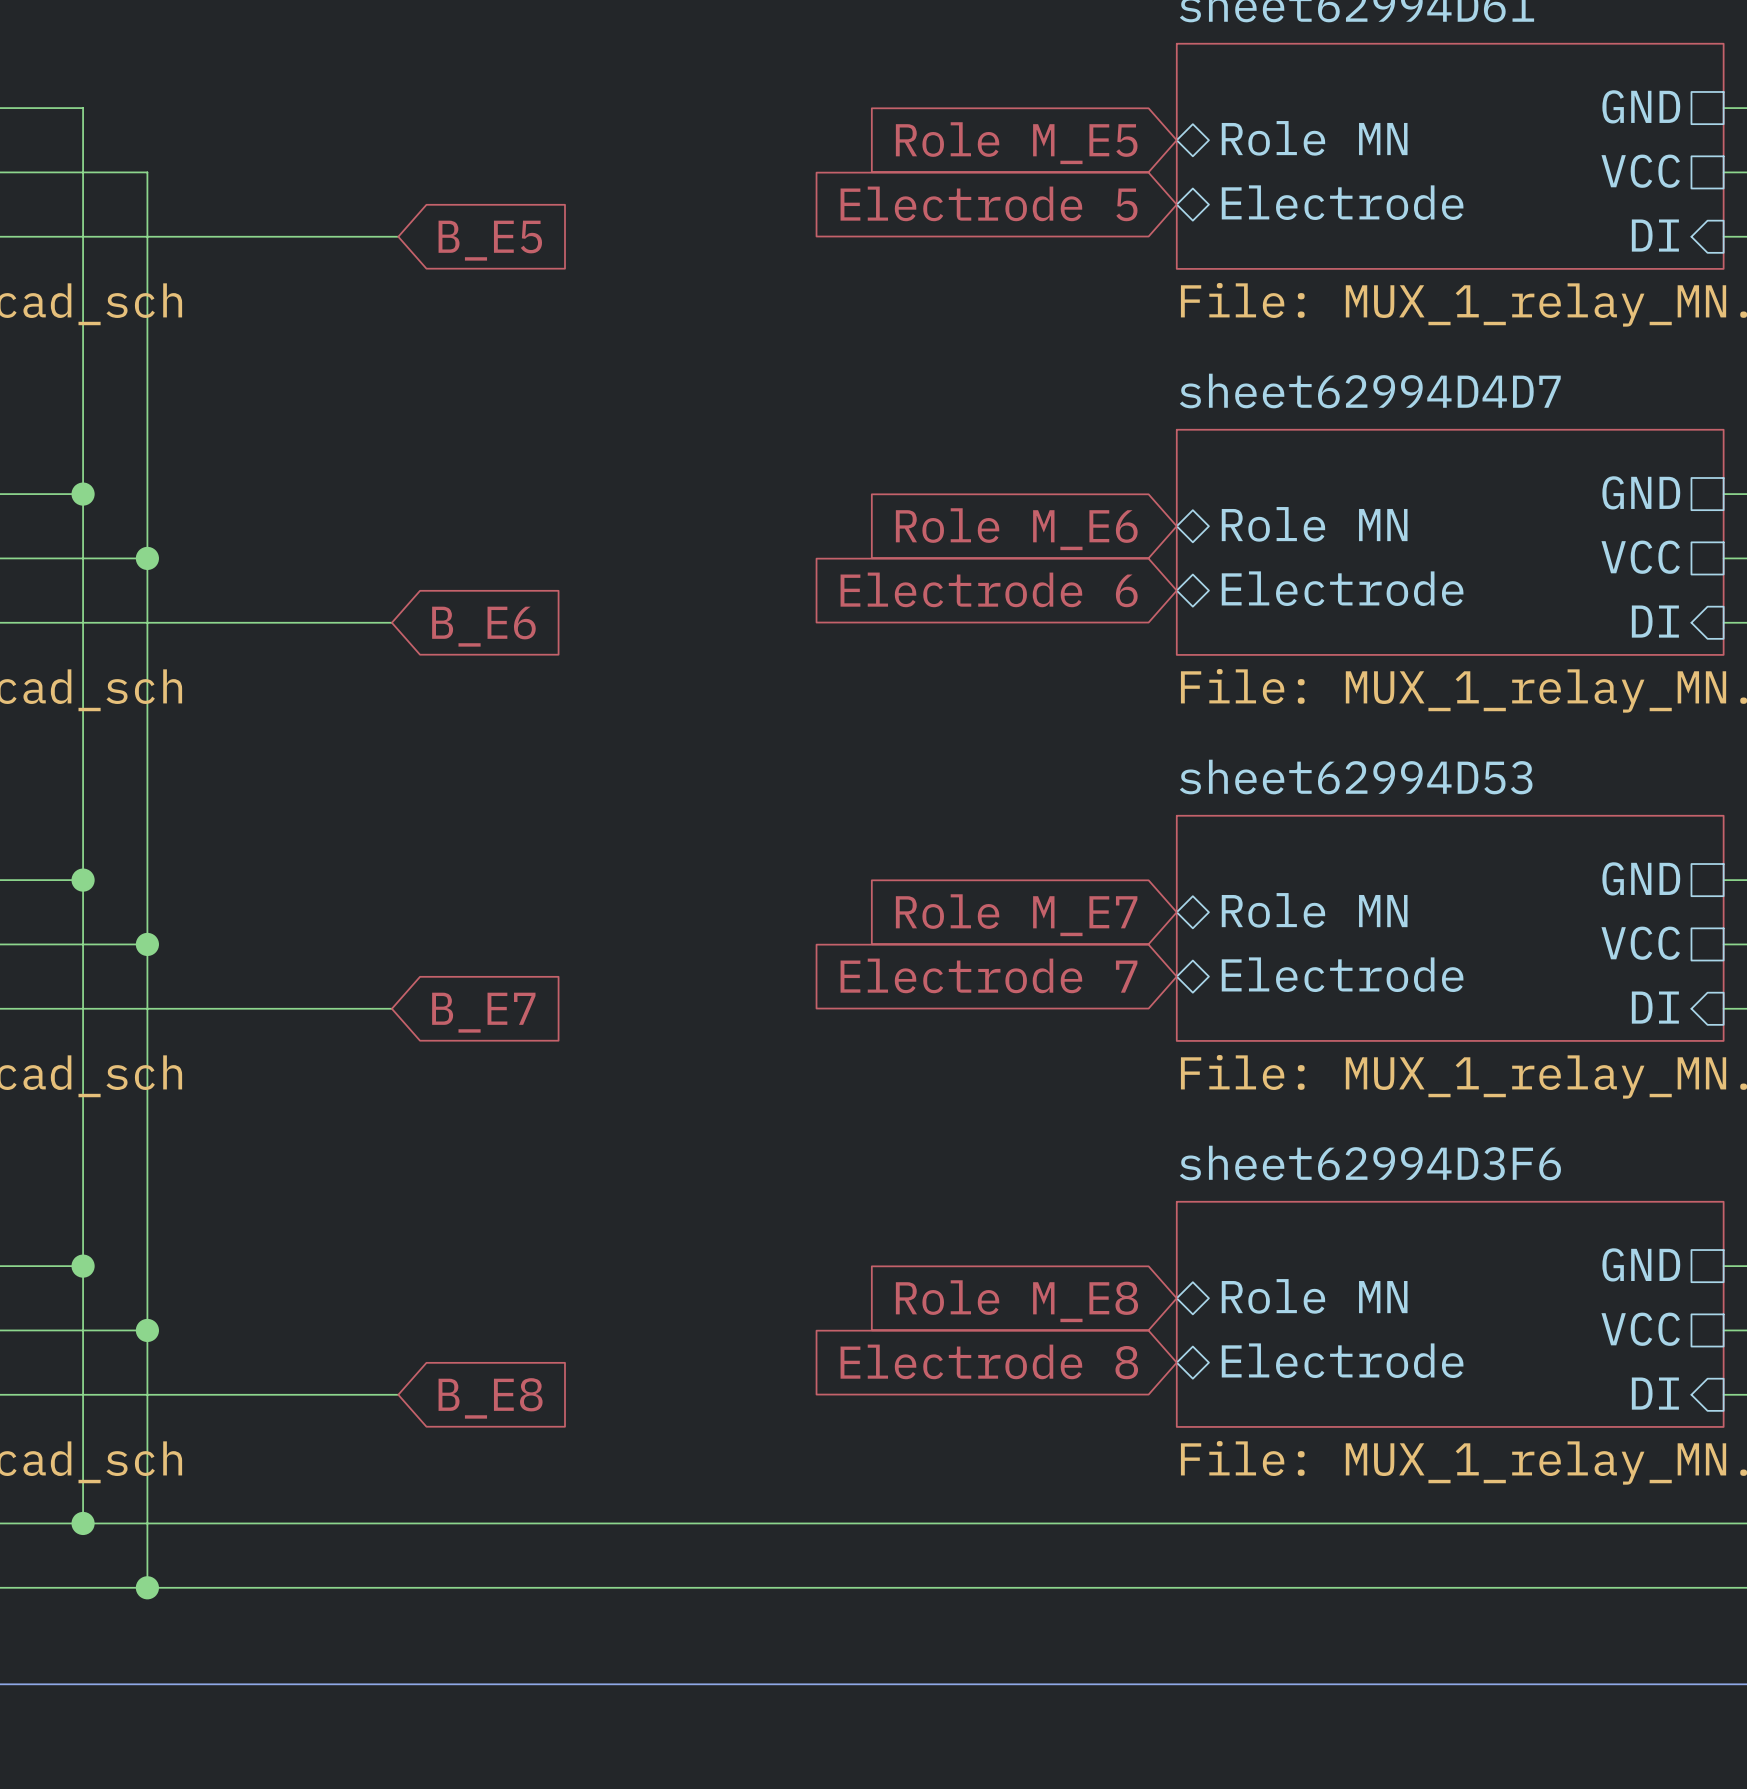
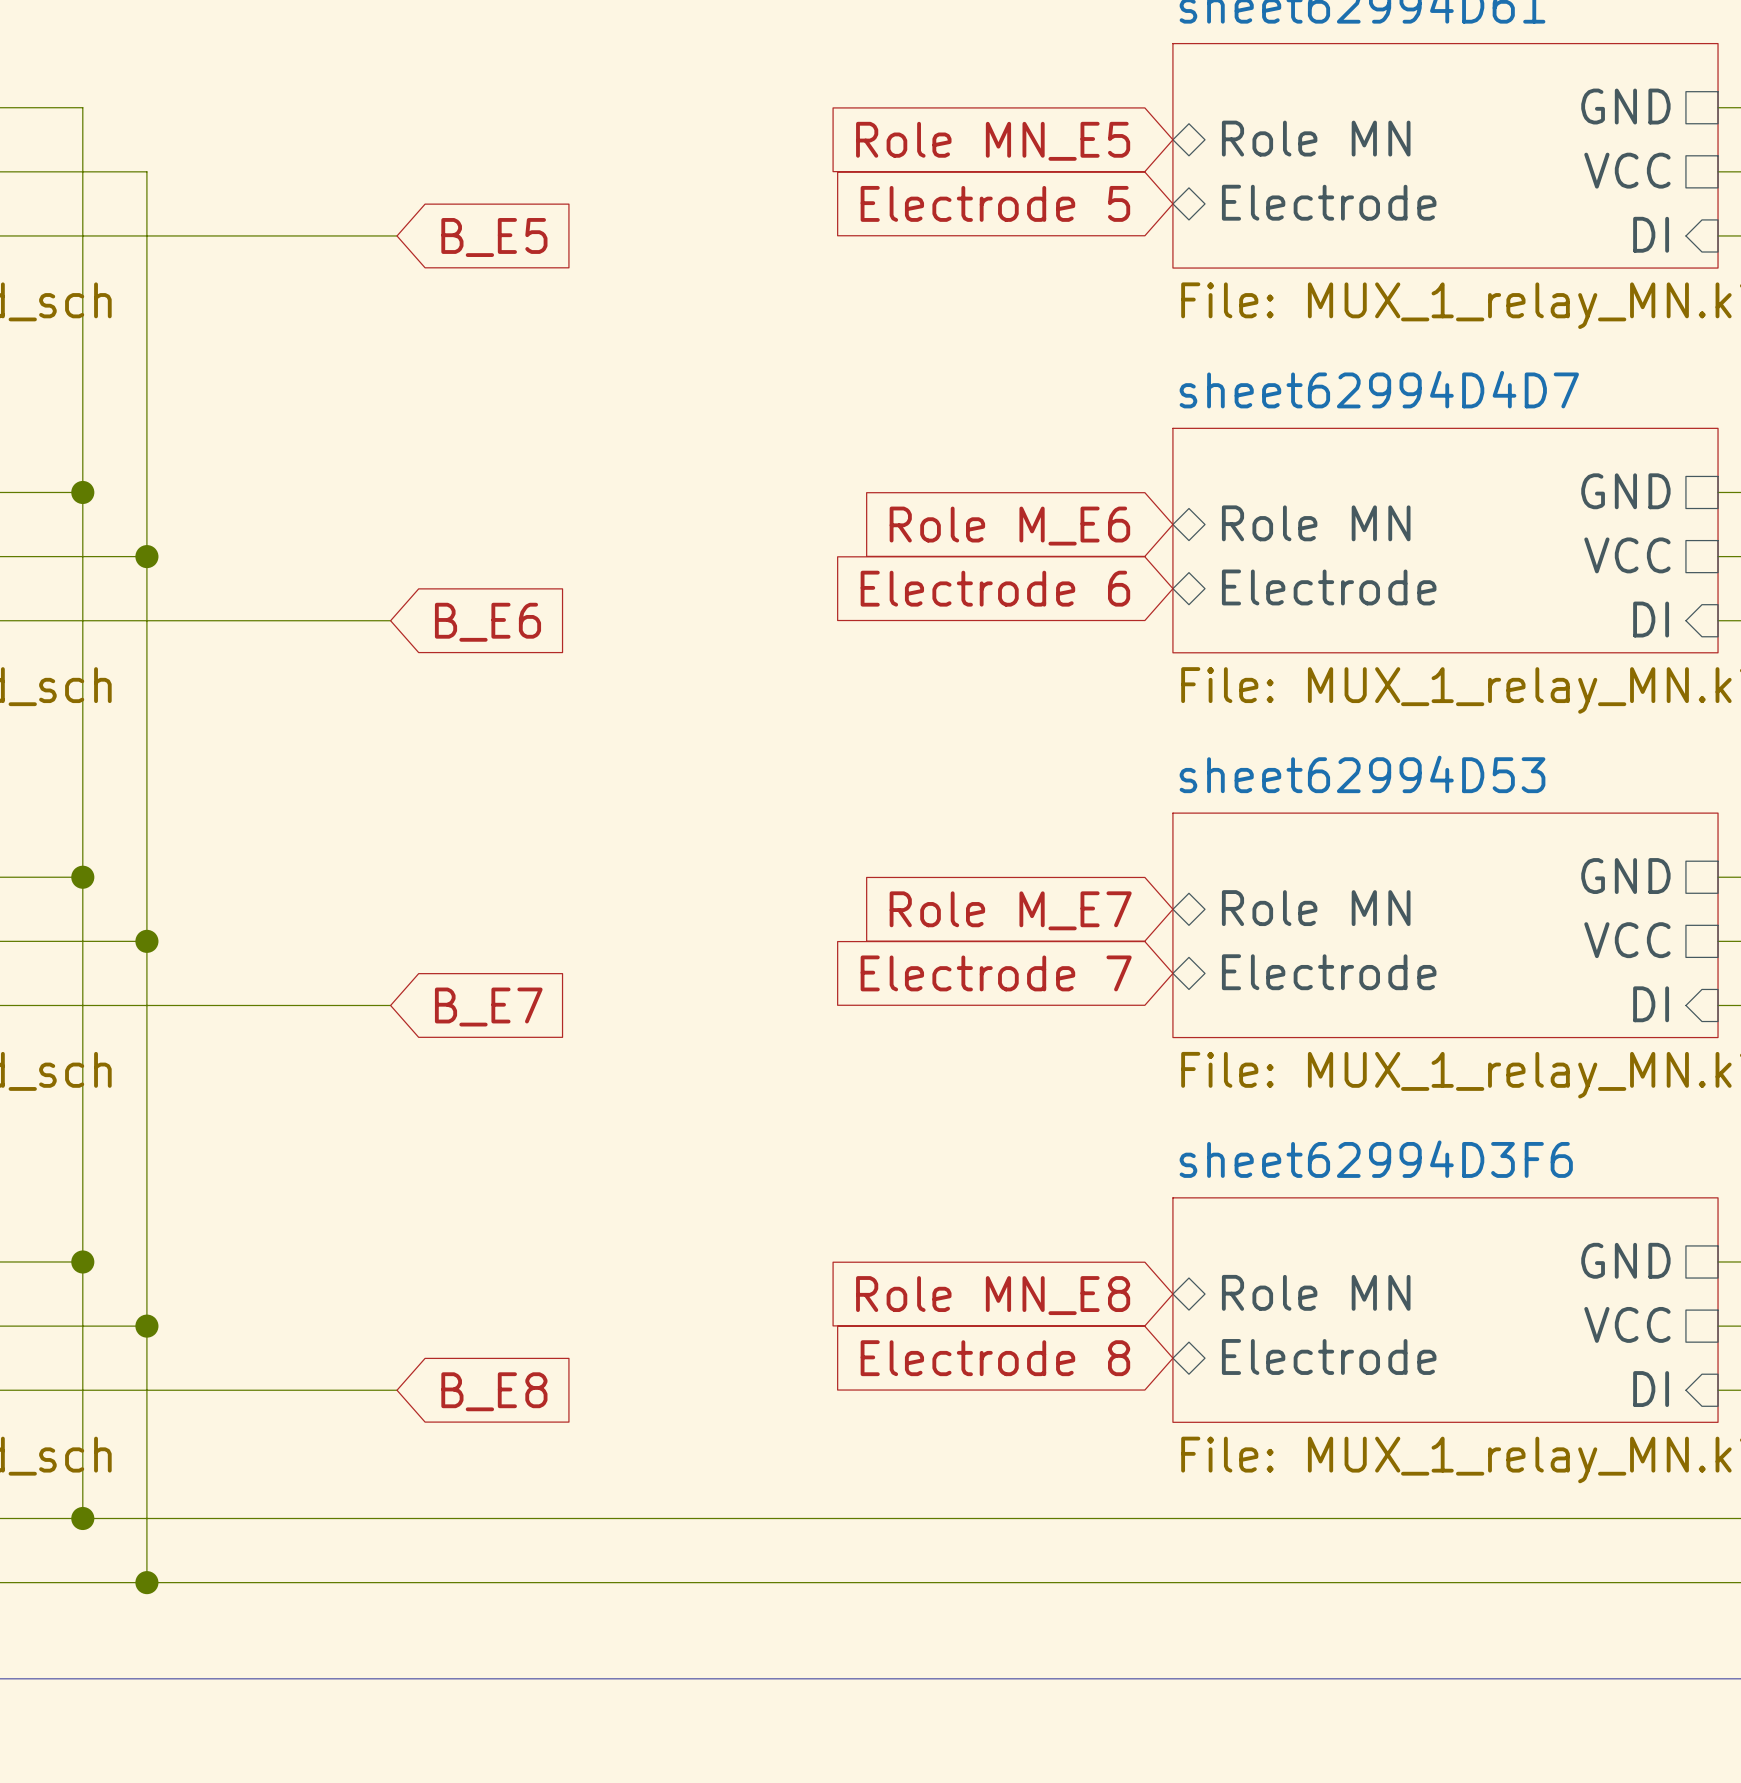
global label: Role M_E5 (1016, 143) -> Role MN_E5 (993, 141)
global label: Role M_E8 (1016, 1301) -> Role MN_E8 (993, 1295)

